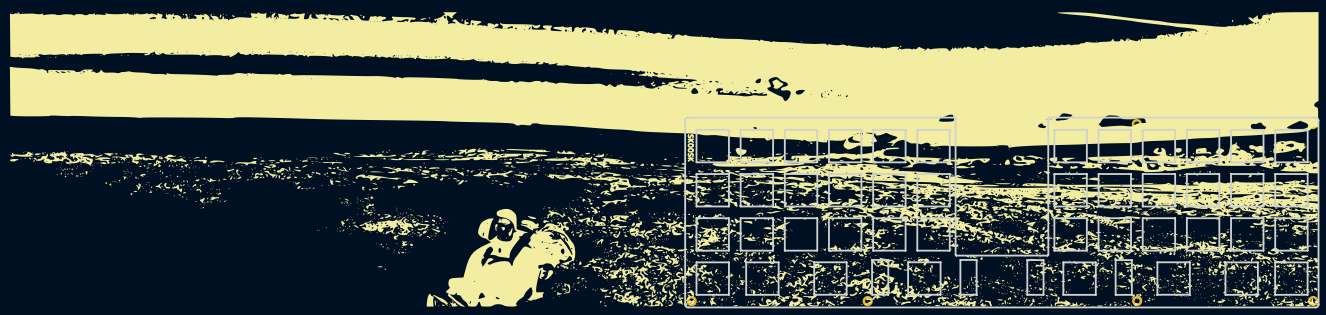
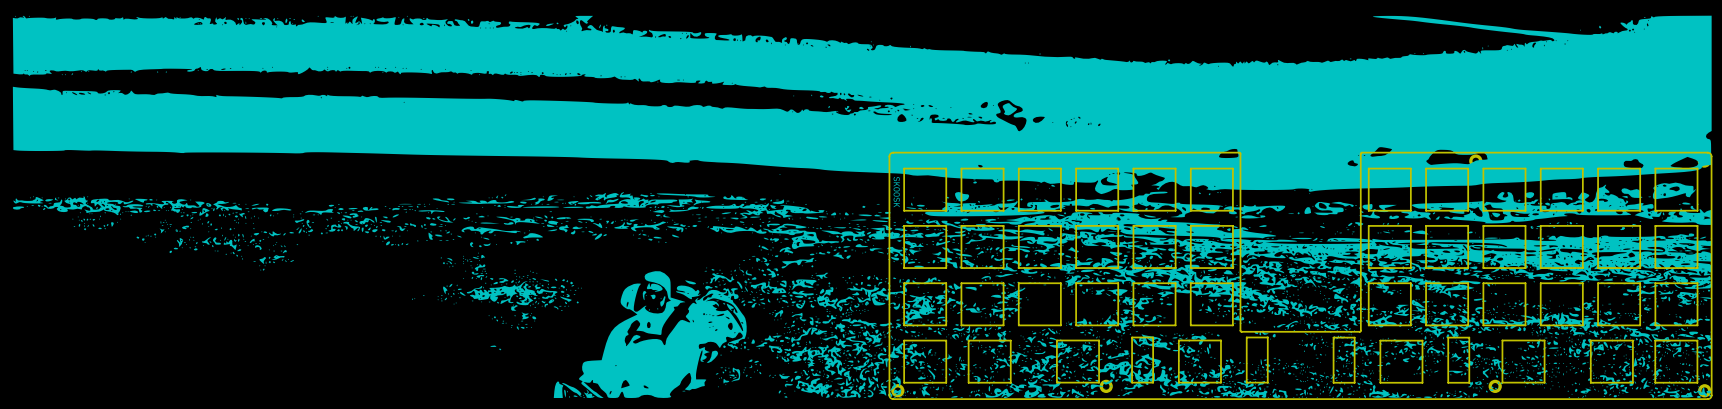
part position: (1137, 300) -> (1495, 386)
part position: (867, 301) -> (1106, 386)

